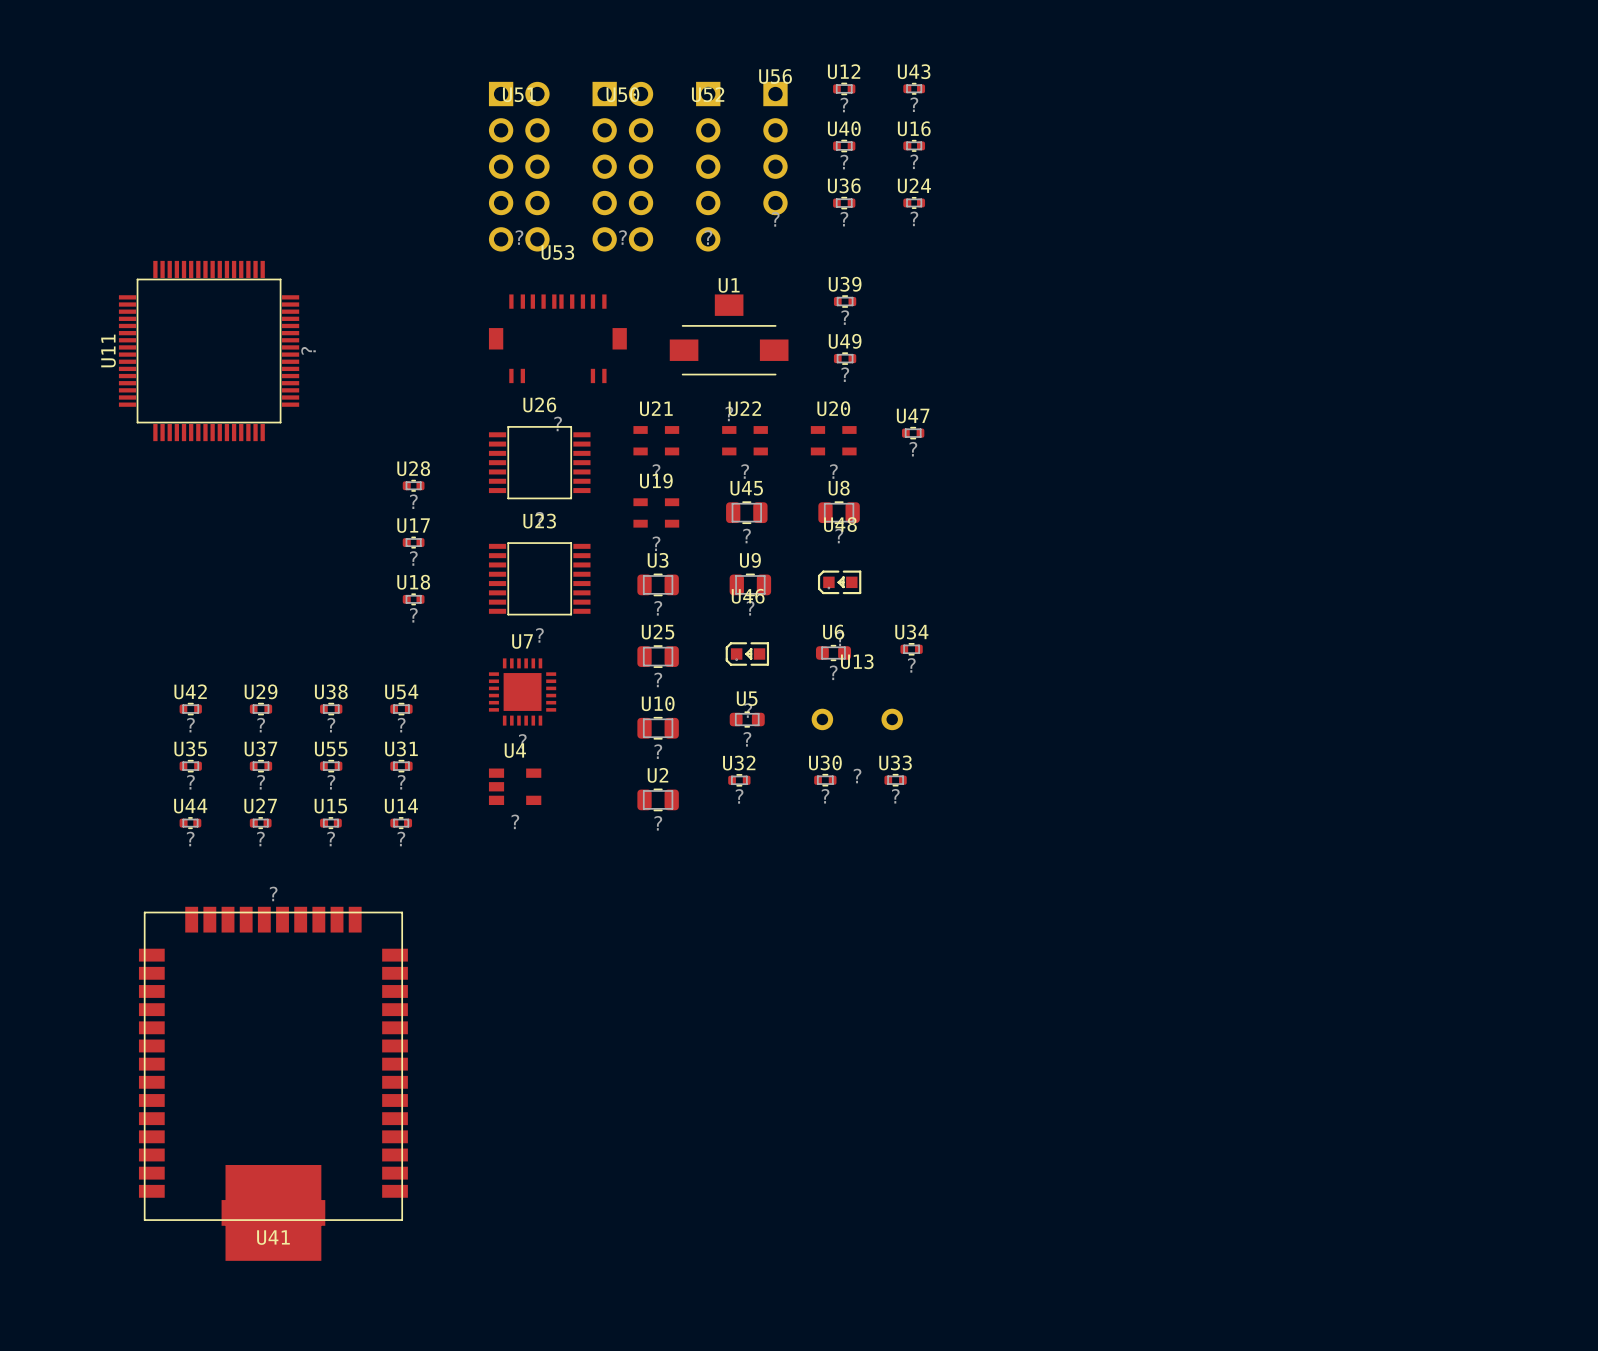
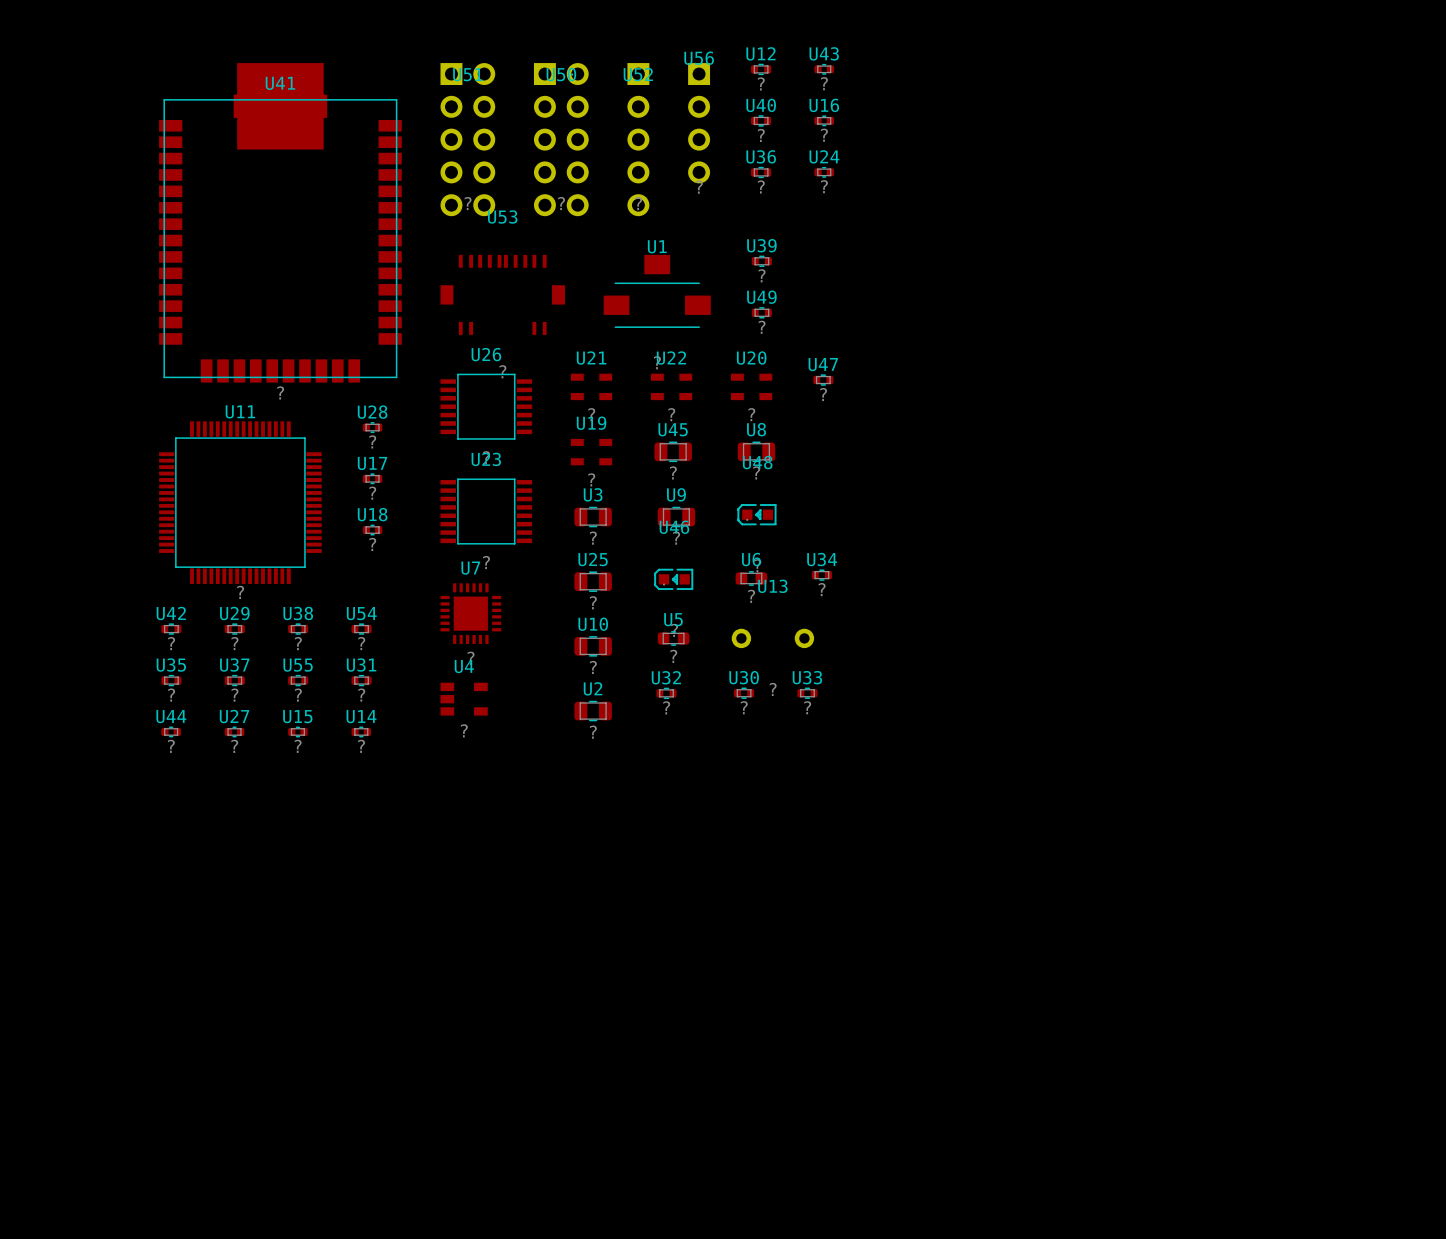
U11 name rotation: 0° (108, 350) -> 90° clockwise (240, 411)
U11 name position: U11 (108, 350) -> U11 (240, 411)
U11 value rotation: 0° (308, 350) -> 90° clockwise (240, 592)
U11 value position: ? (308, 350) -> ? (240, 592)
U11 position: (209, 351) -> (240, 502)
U41 rotation: 0° (273, 1083) -> 180° (280, 222)
U41 position: (273, 1083) -> (280, 222)

